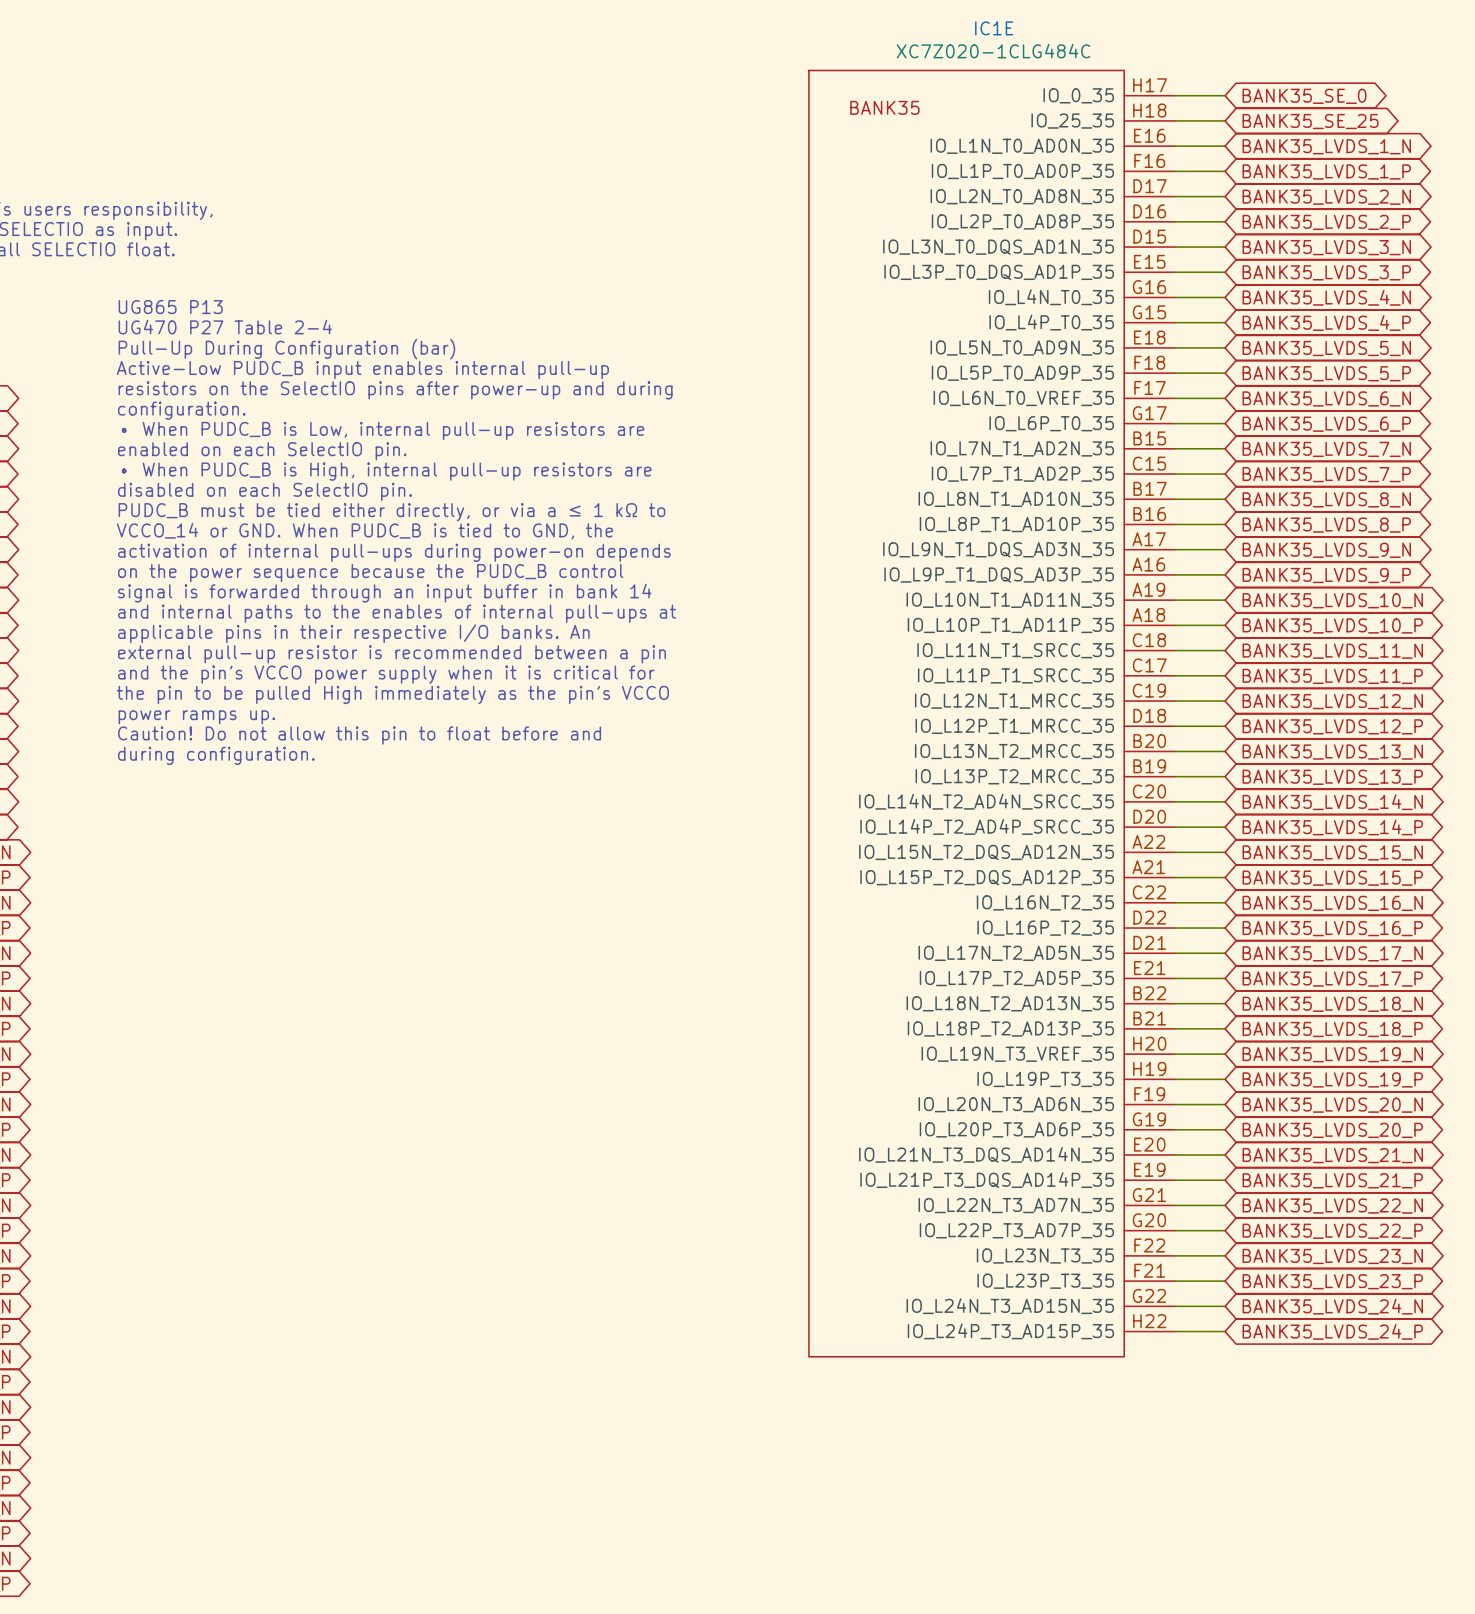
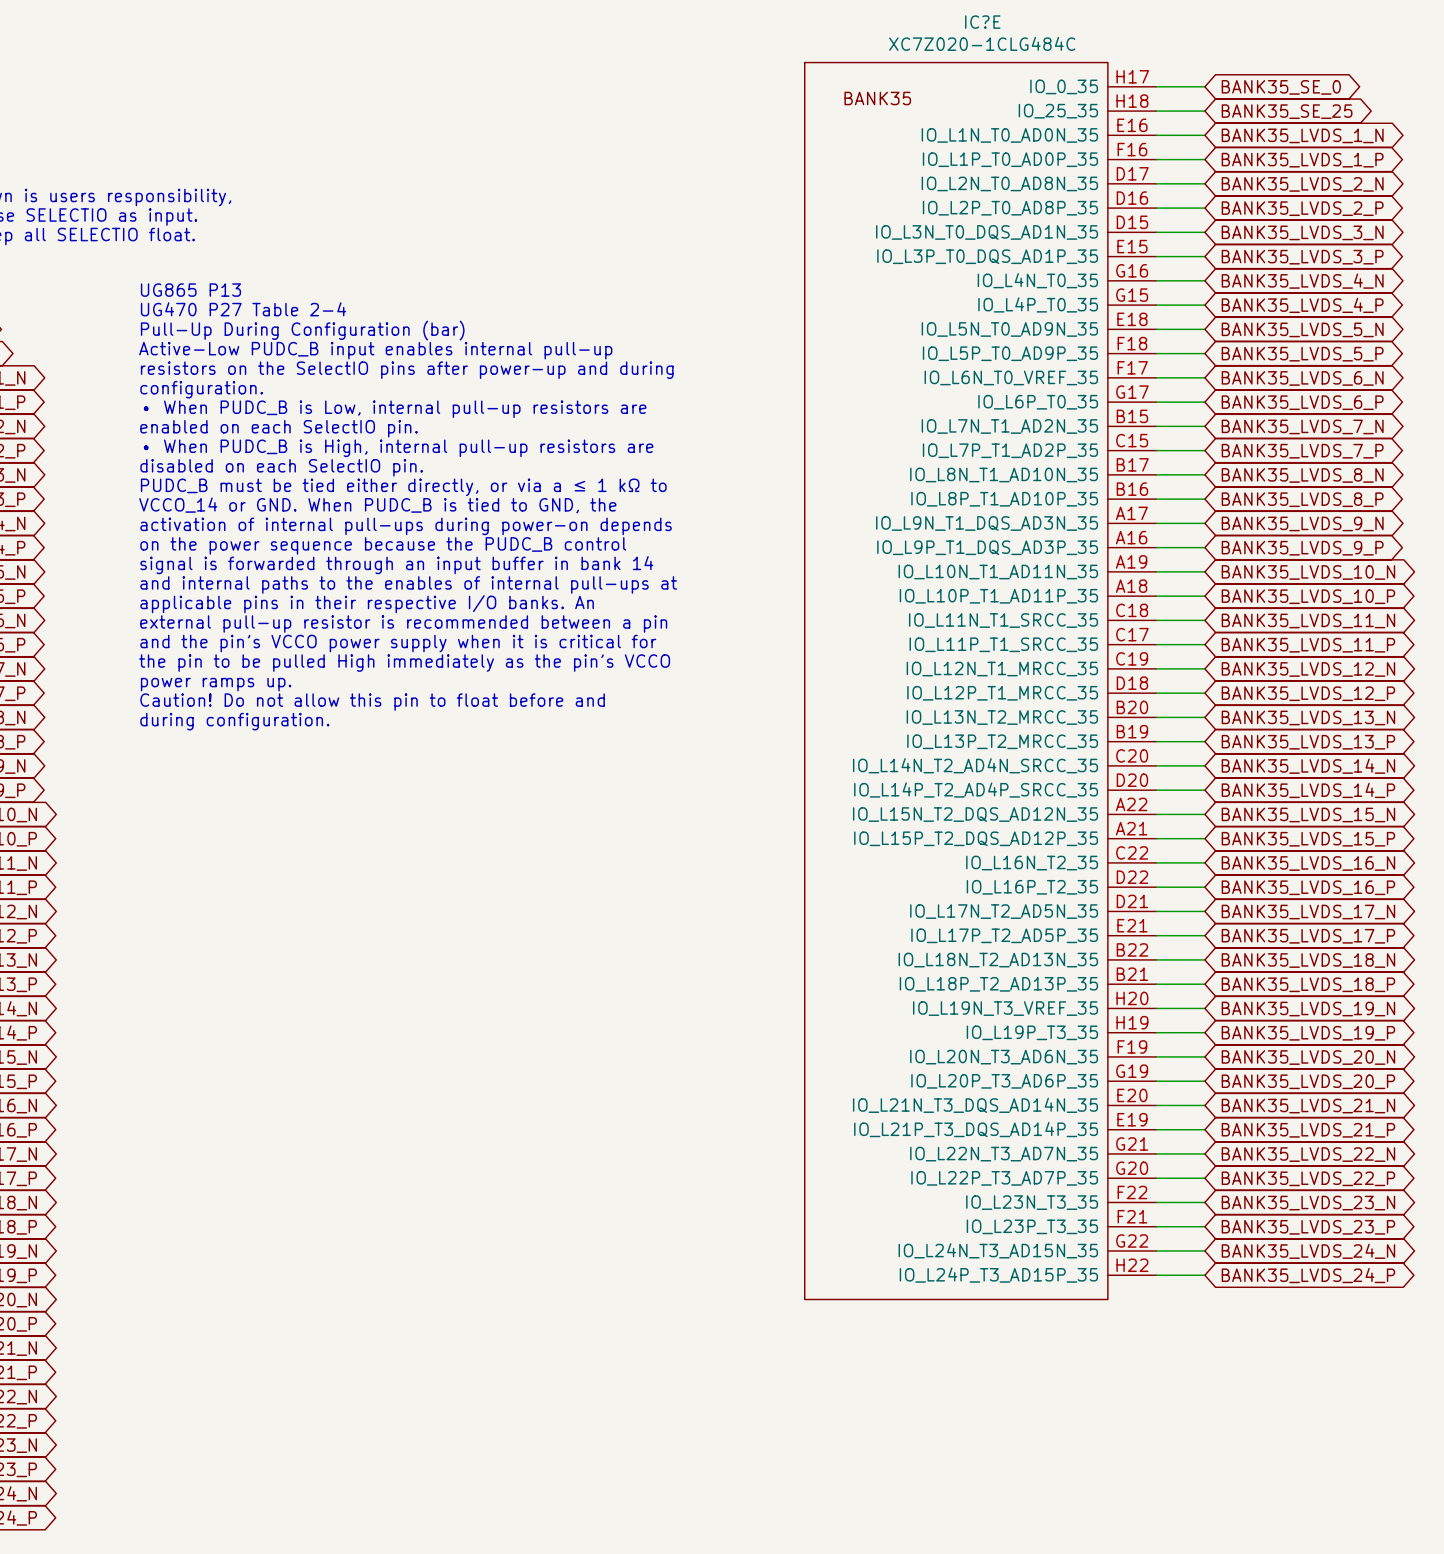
IC1E name: IC1E (994, 28) -> IC?E (982, 22)

